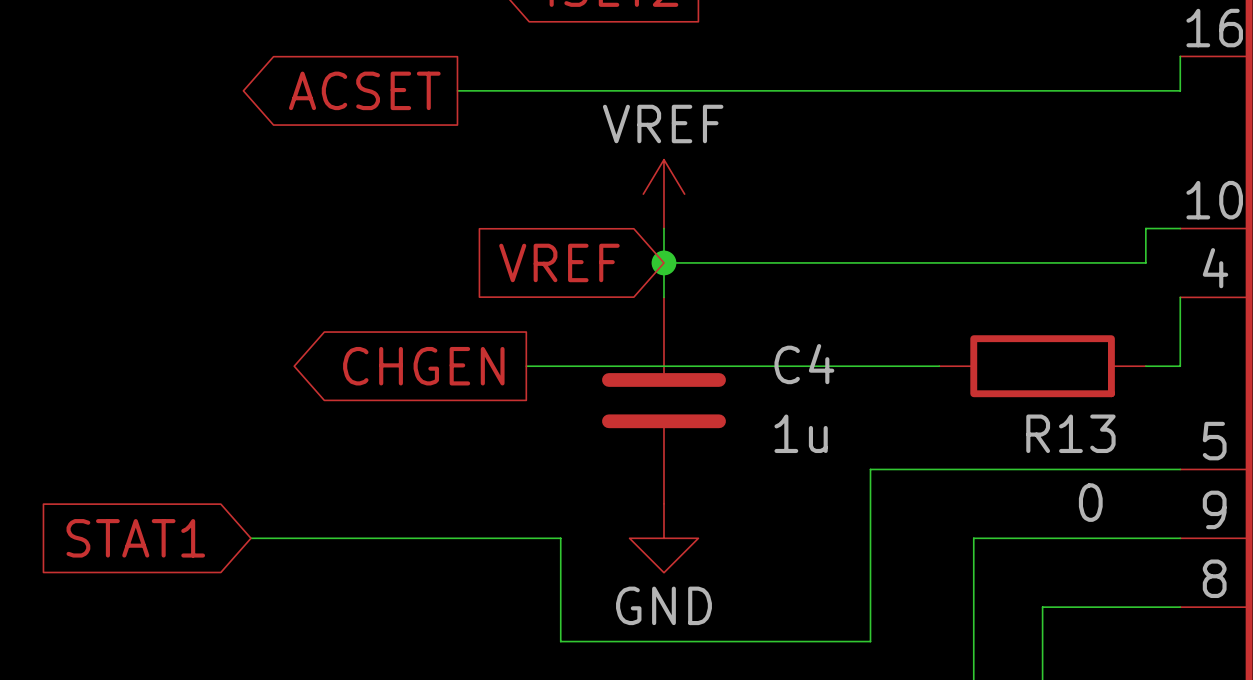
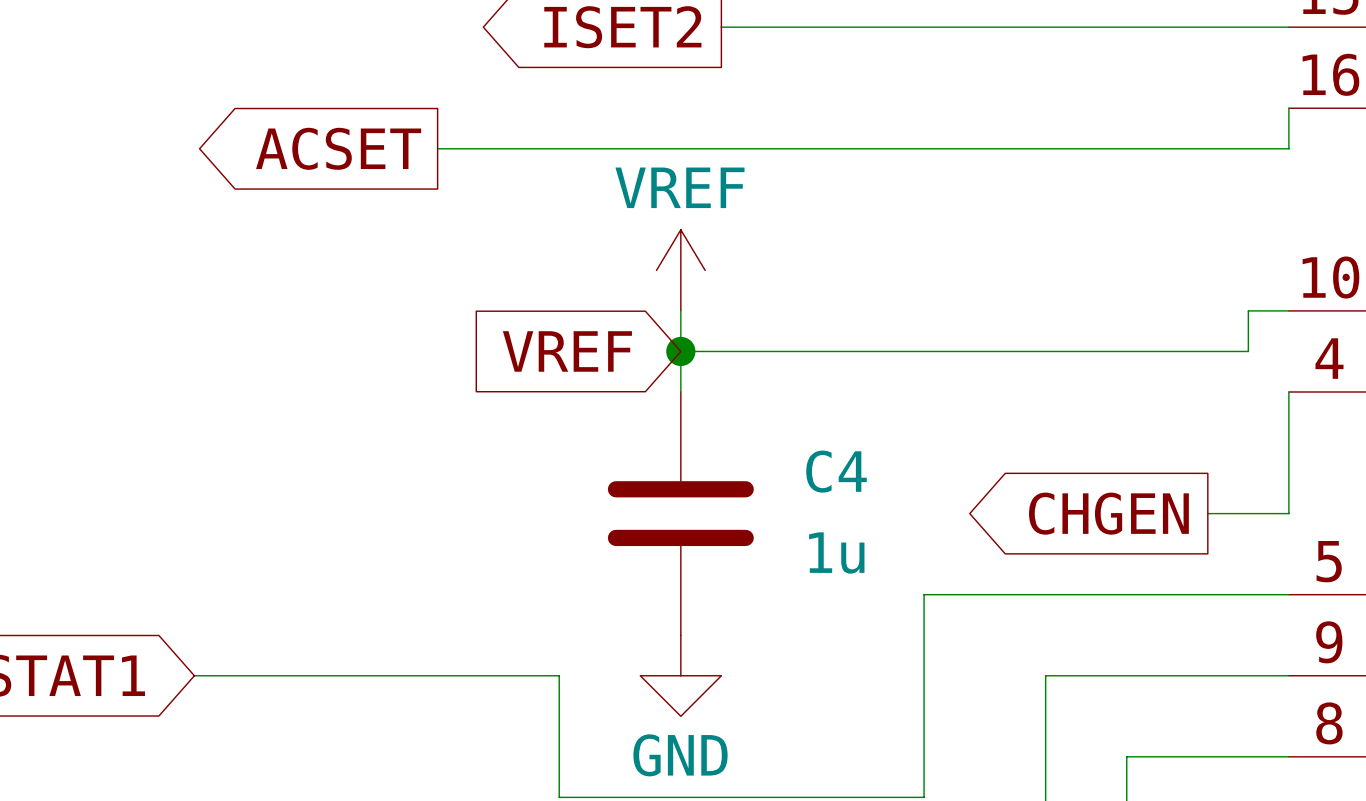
global label position: CHGEN (423, 366) -> CHGEN (1108, 513)
wire: (526, 366) (939, 366) -> none
R13: 0 (1042, 366) -> none
wire: (1145, 366) (1180, 366) -> (1207, 513) (1288, 513) (1288, 473)

